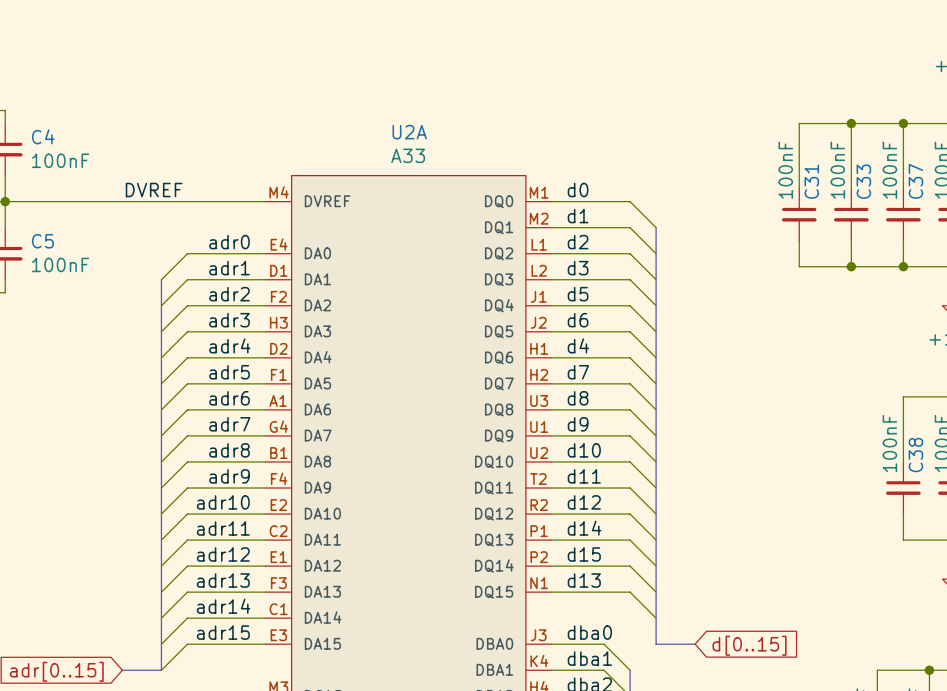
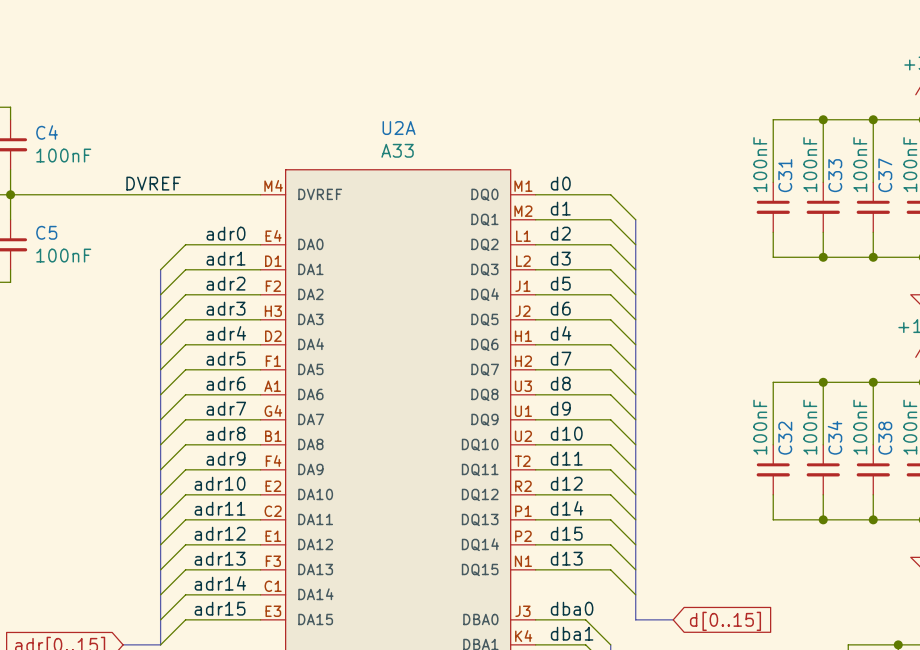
wire: none -> (823, 382) (823, 444)
junction: none -> (823, 382)
wire: none -> (873, 382) (773, 382) (773, 444)
junction: none -> (873, 382)
C32: none -> 100nF (773, 469)
C34: none -> 100nF (823, 469)
wire: none -> (773, 494) (773, 519) (873, 519)
wire: none -> (823, 494) (823, 519)
junction: none -> (823, 519)
junction: none -> (873, 519)

